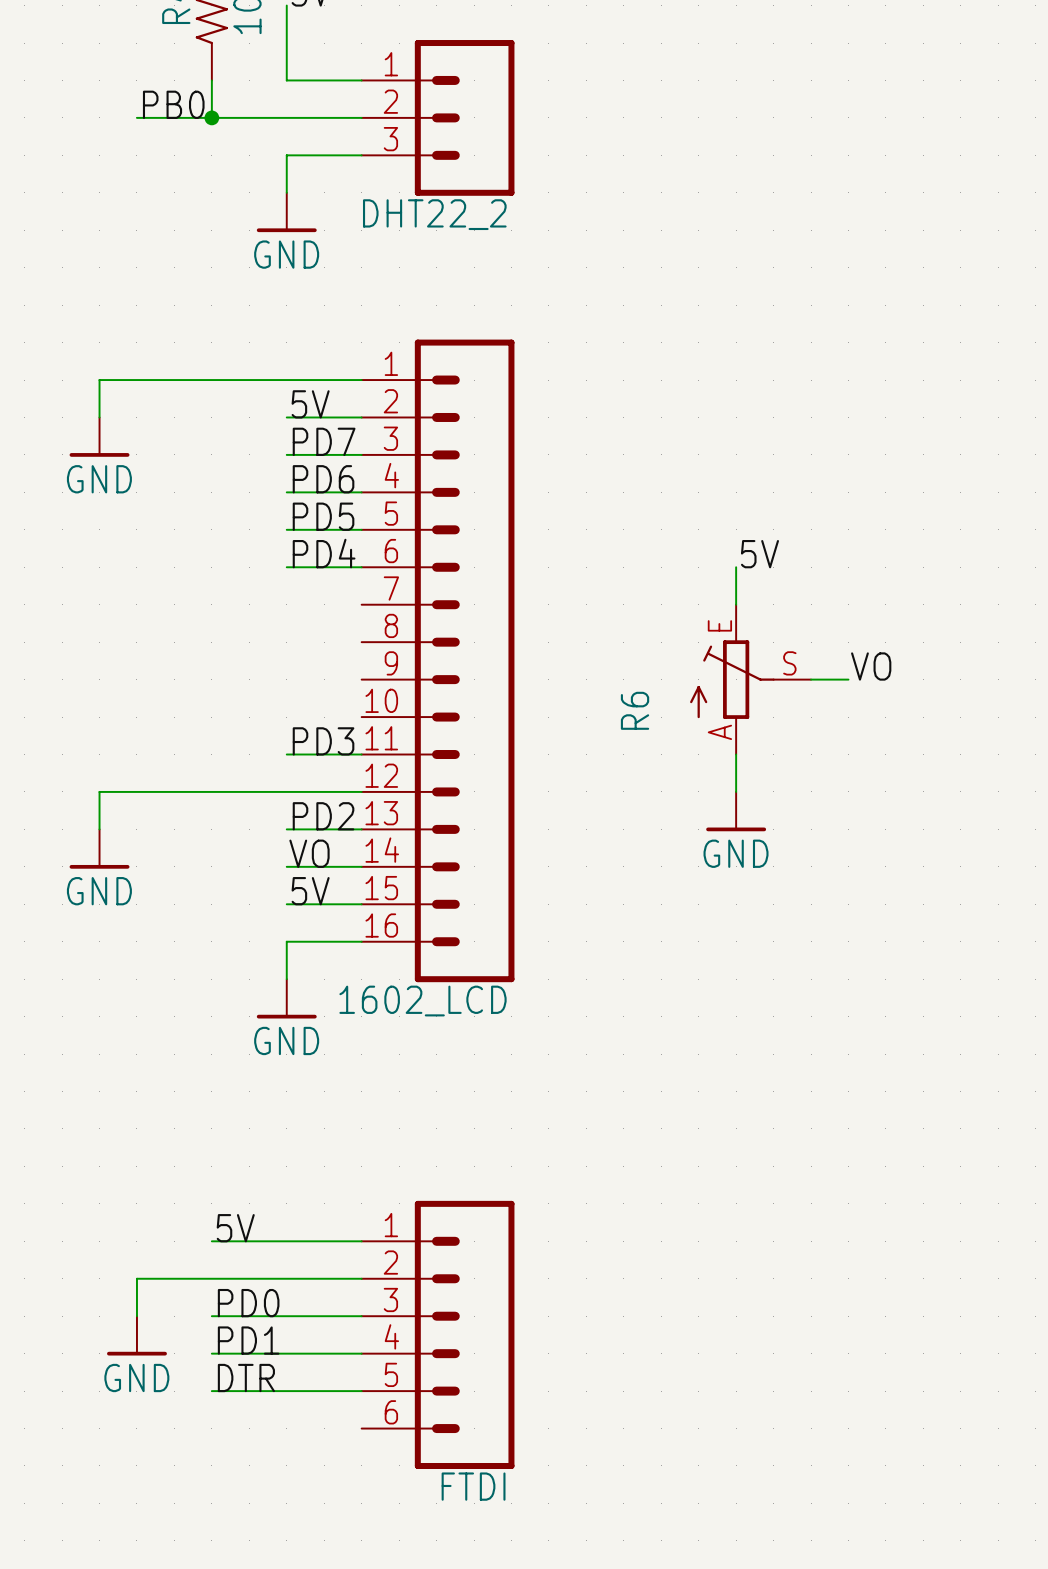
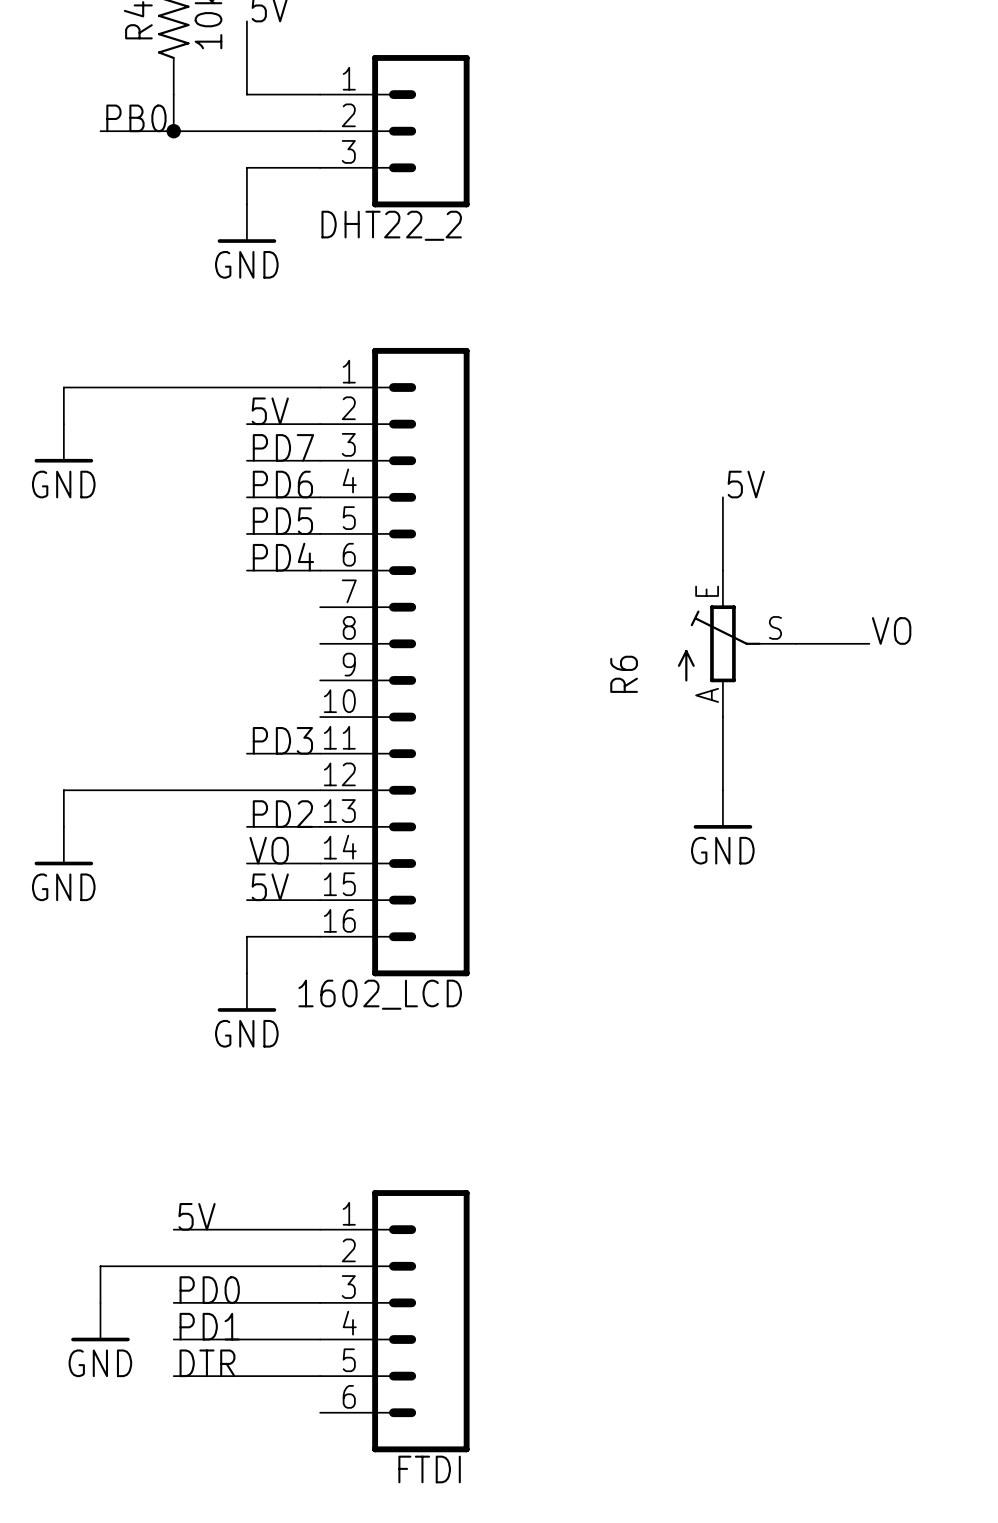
wire: none -> (722, 497) (722, 570)
label position: 5V (759, 554) -> 5V (746, 484)
wire: (736, 567) (736, 604) -> none
wire: none -> (796, 643) (869, 643)
label position: VO (871, 666) -> VO (891, 630)
R6 position: (750, 679) -> (737, 643)
wire: (811, 679) (848, 679) -> none
wire: none -> (722, 717) (722, 790)
wire: (736, 754) (736, 791) -> none
power symbol position: GND (736, 811) -> GND (722, 809)

